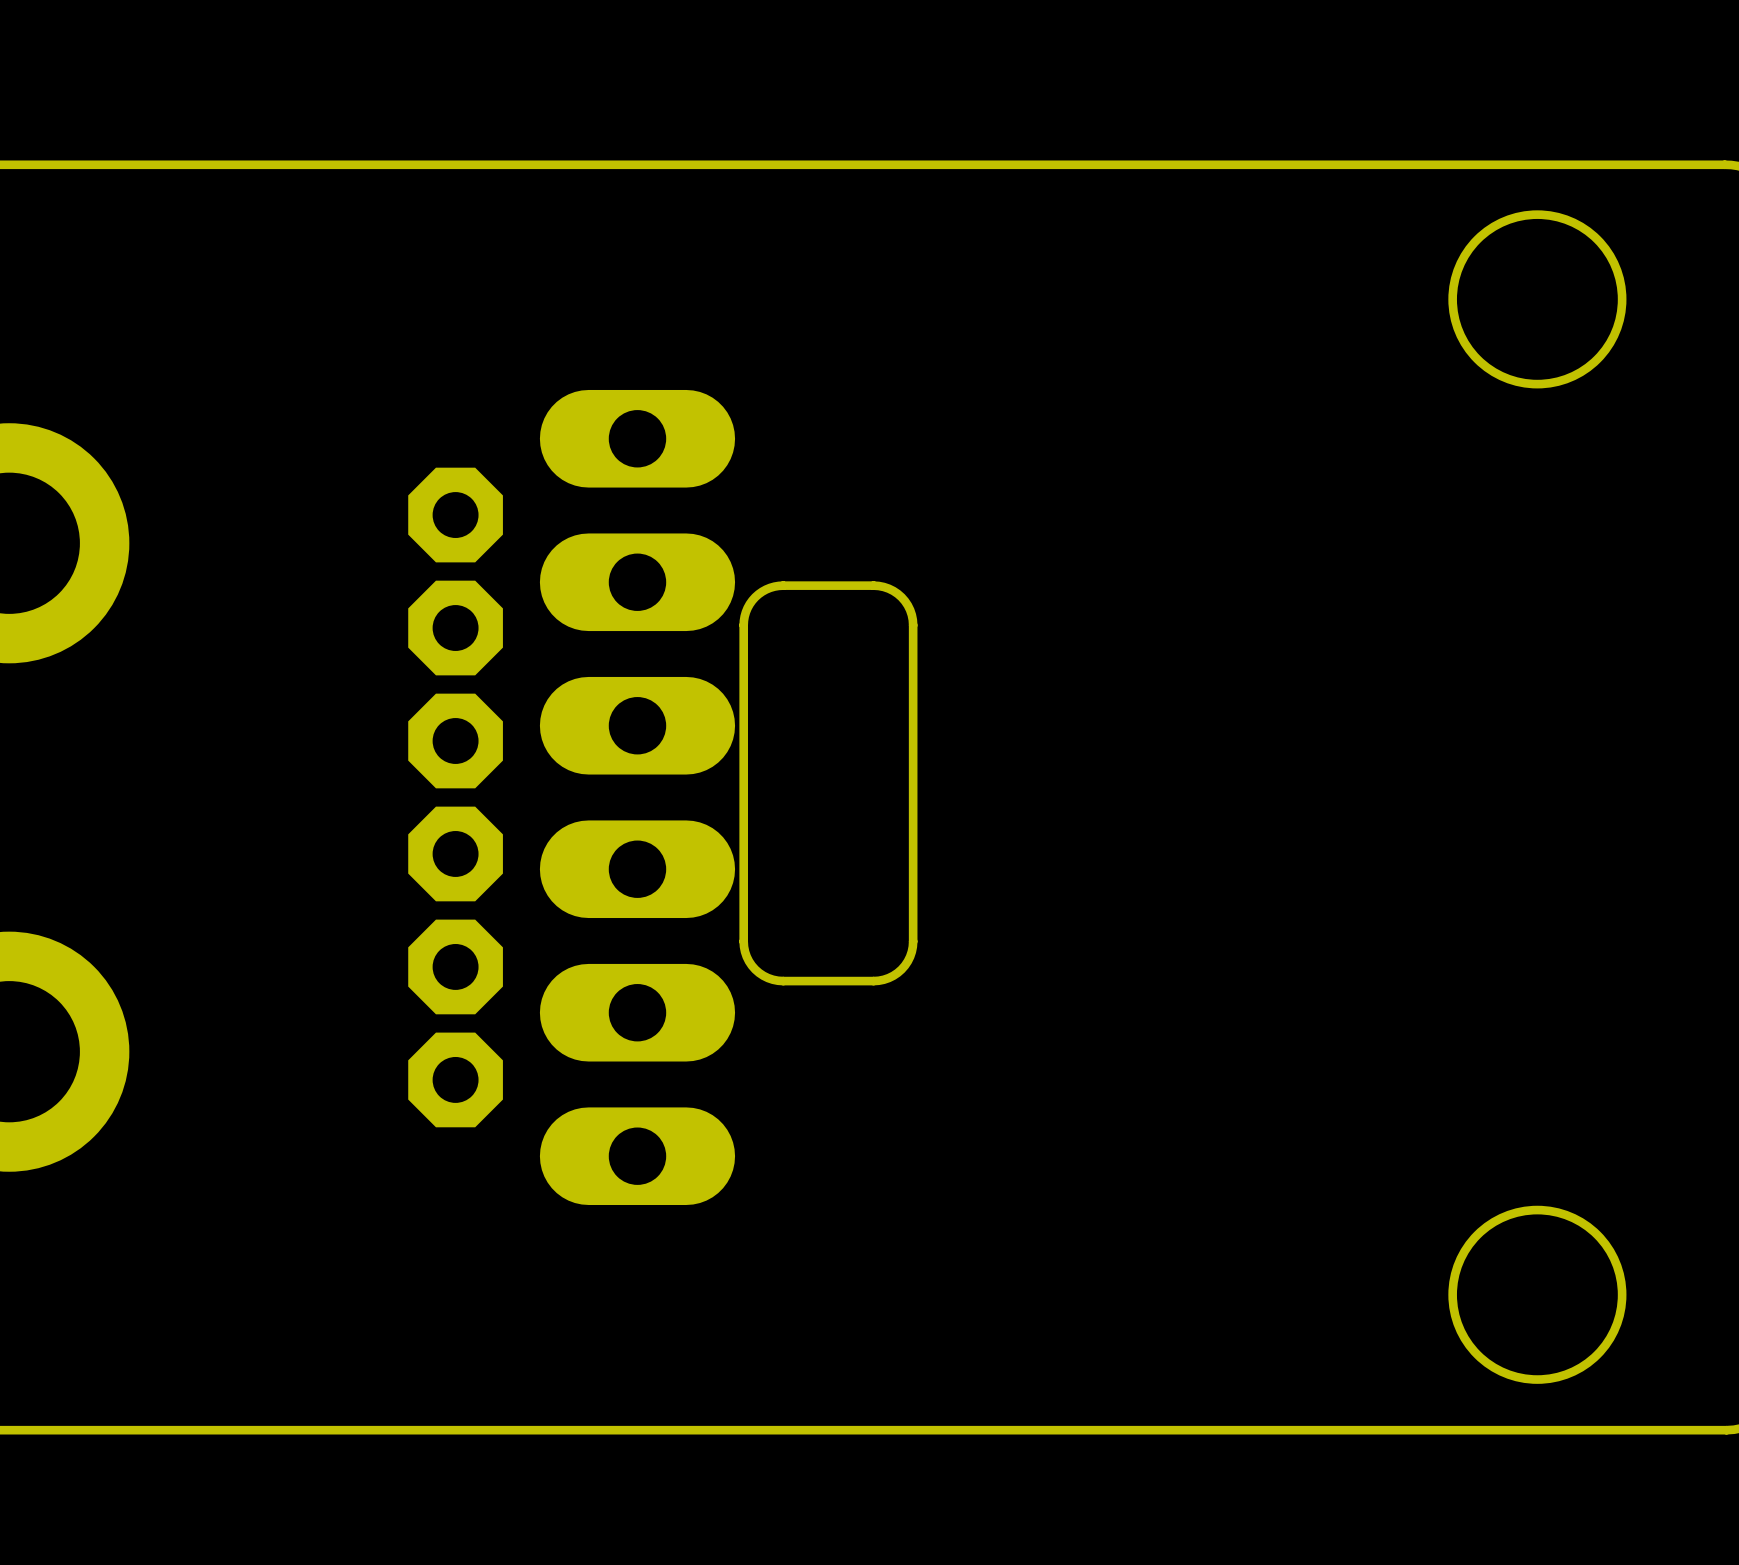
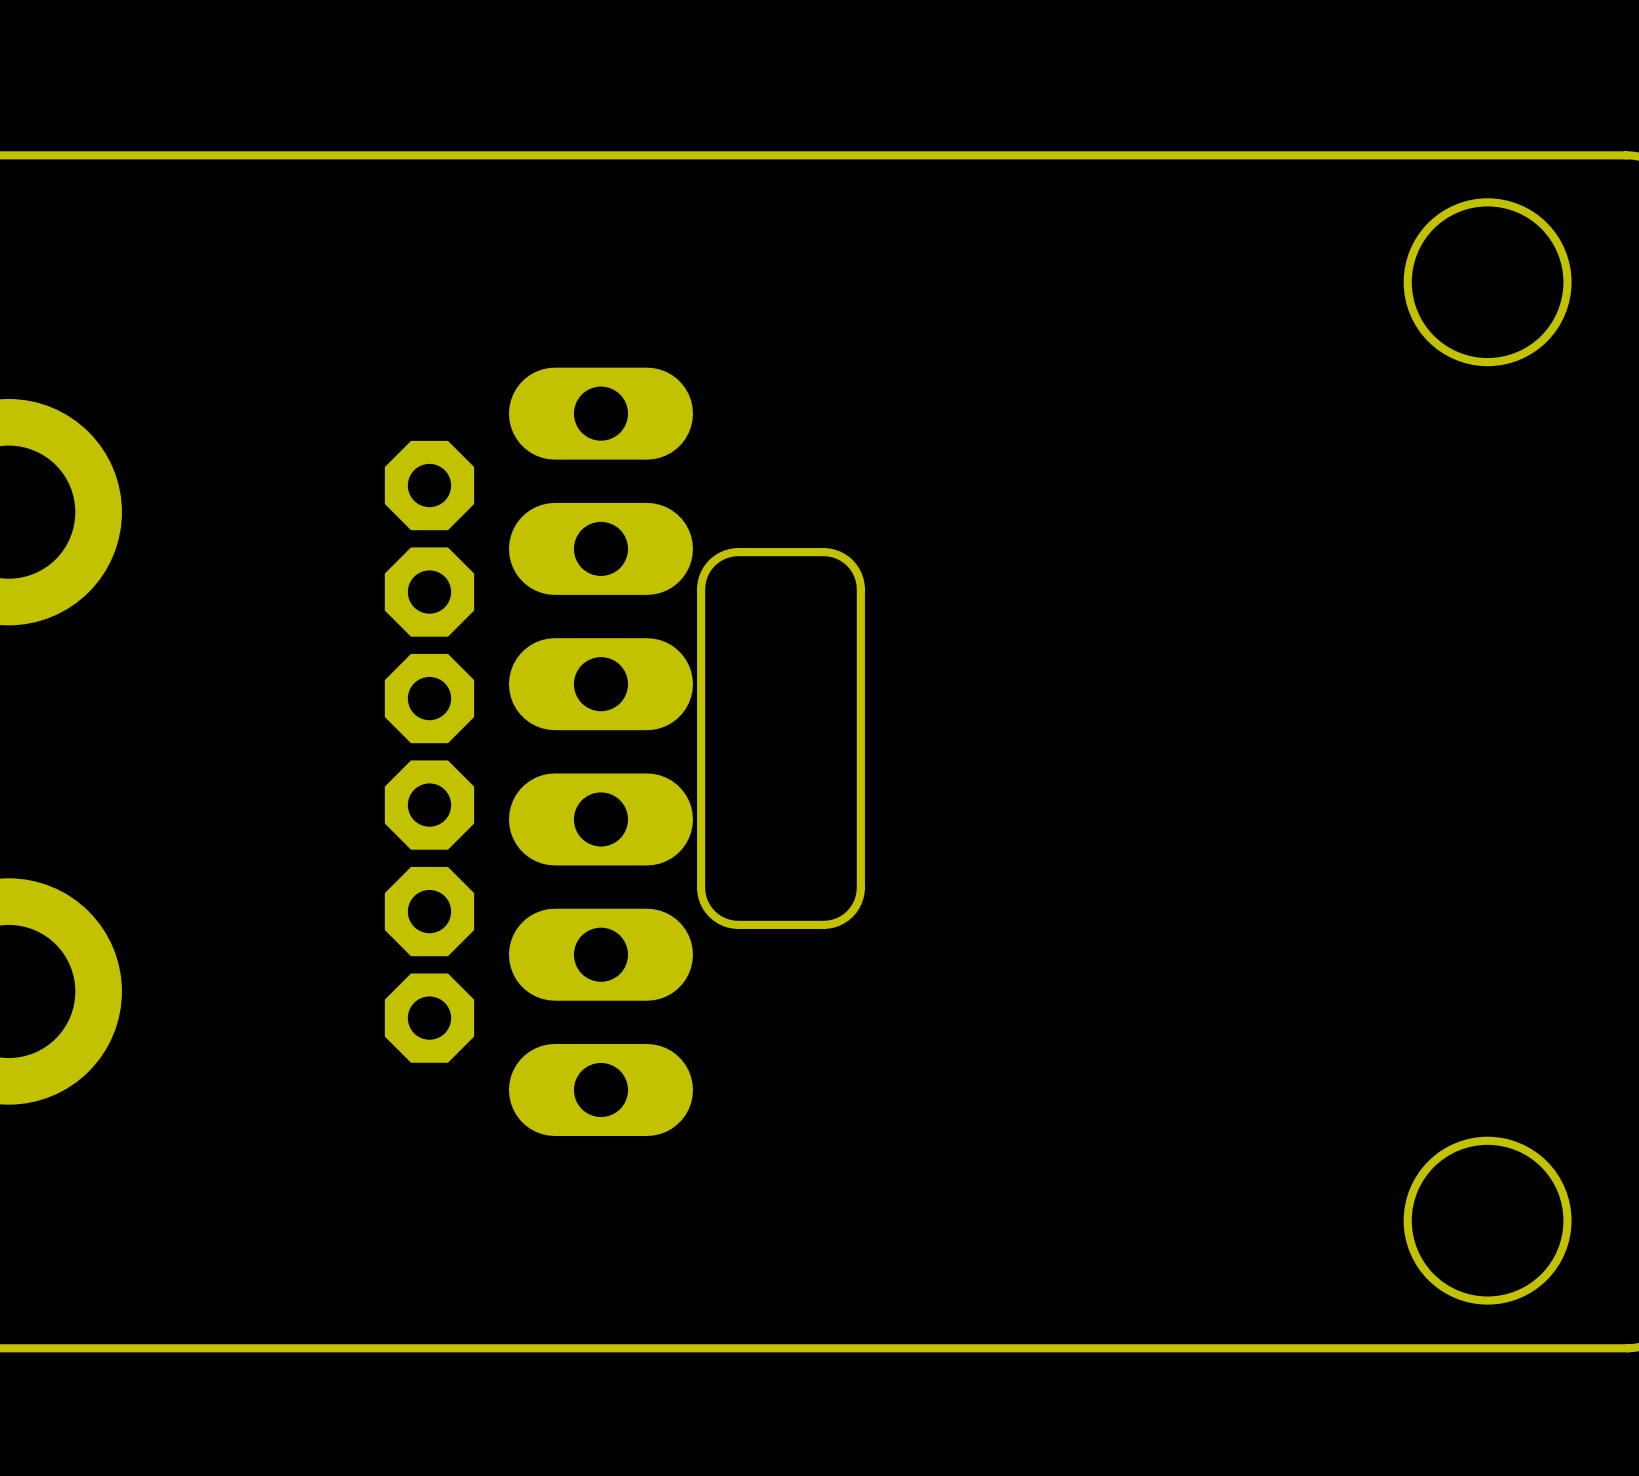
round board edge position: (1537, 299) -> (1487, 282)
round board edge position: (1537, 1294) -> (1487, 1220)

